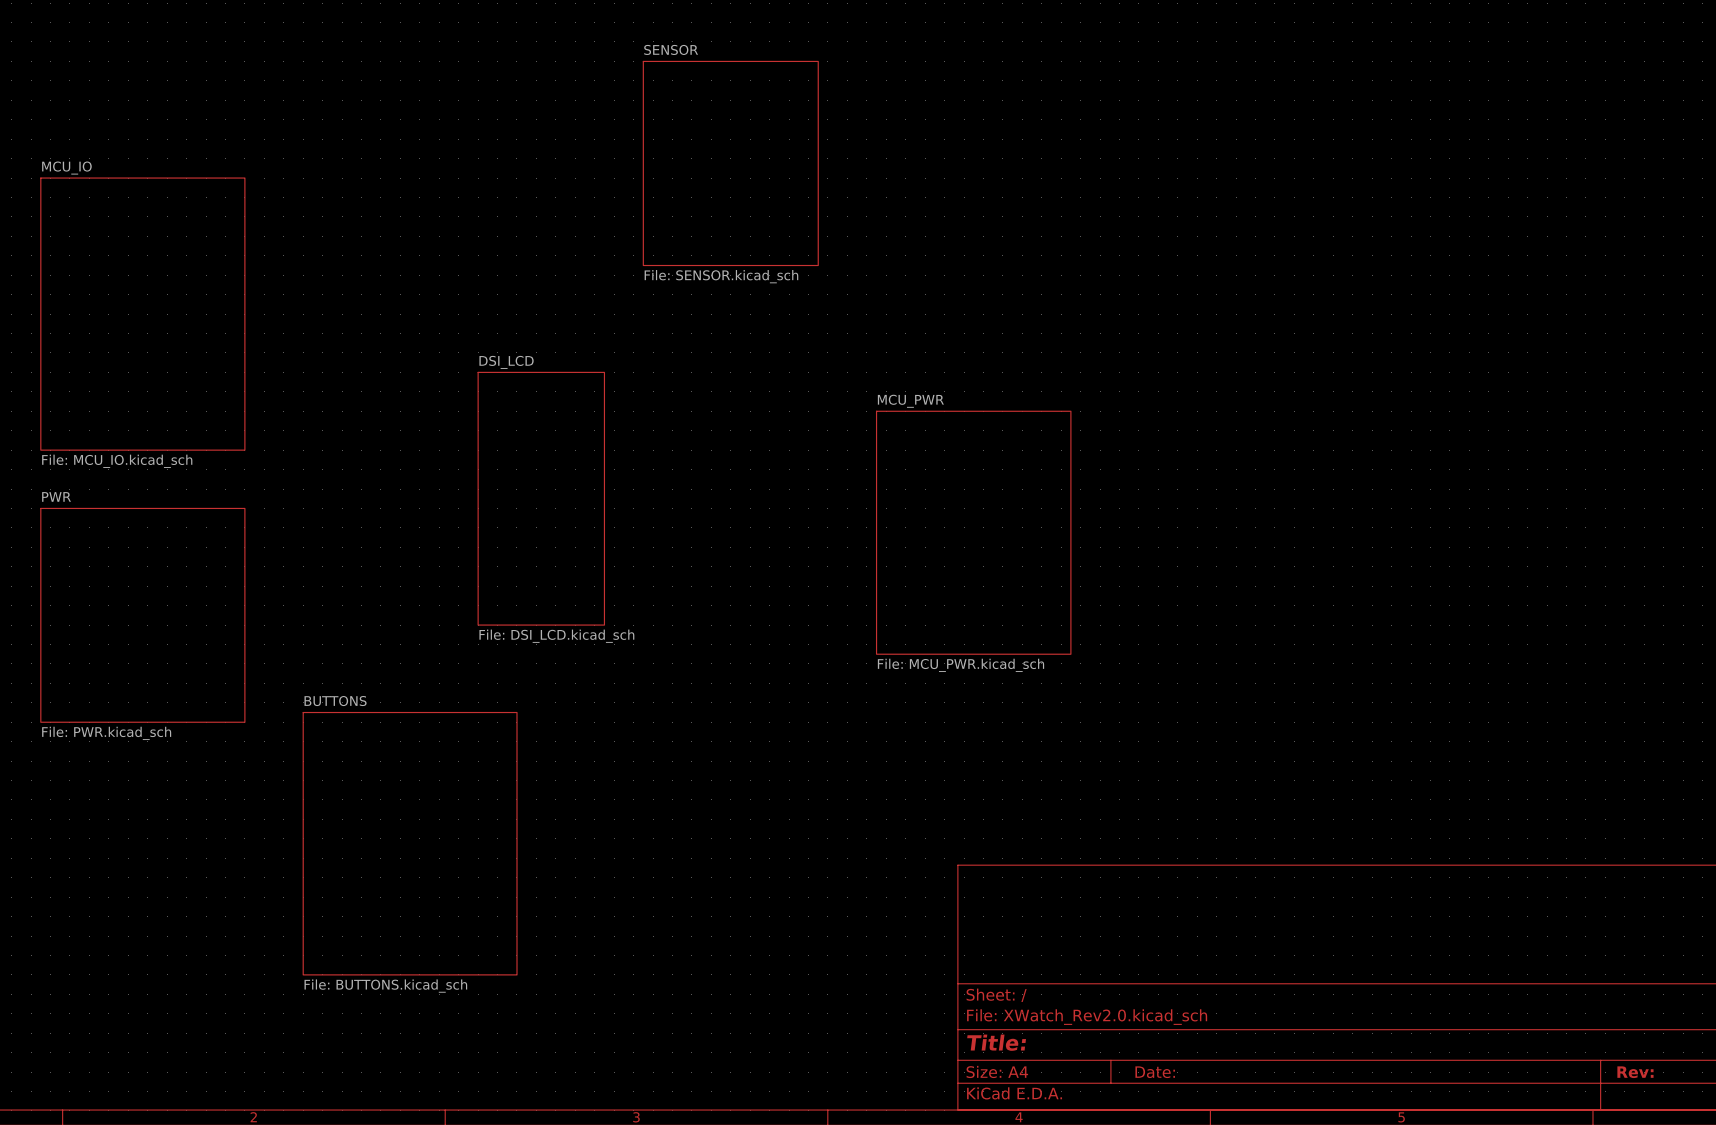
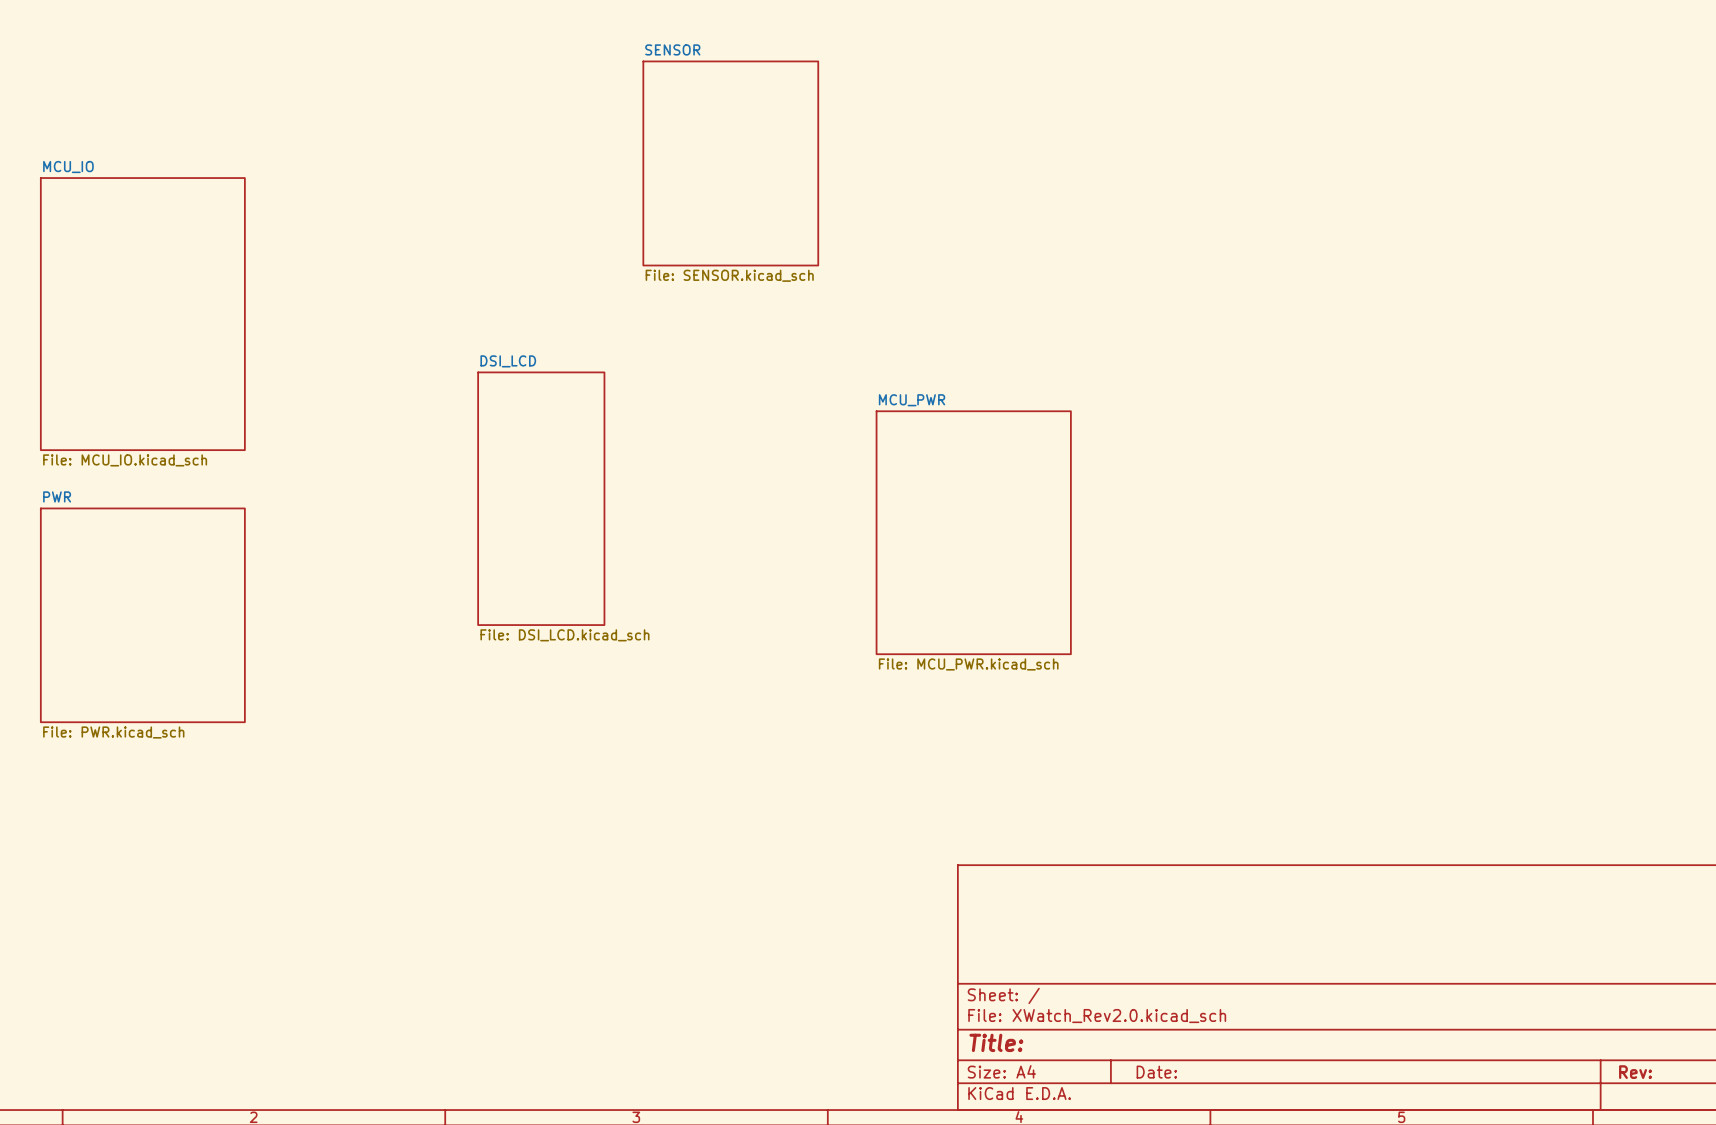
sheet BUTTONS: File: BUTTONS.kicad_sch (410, 843) -> none

